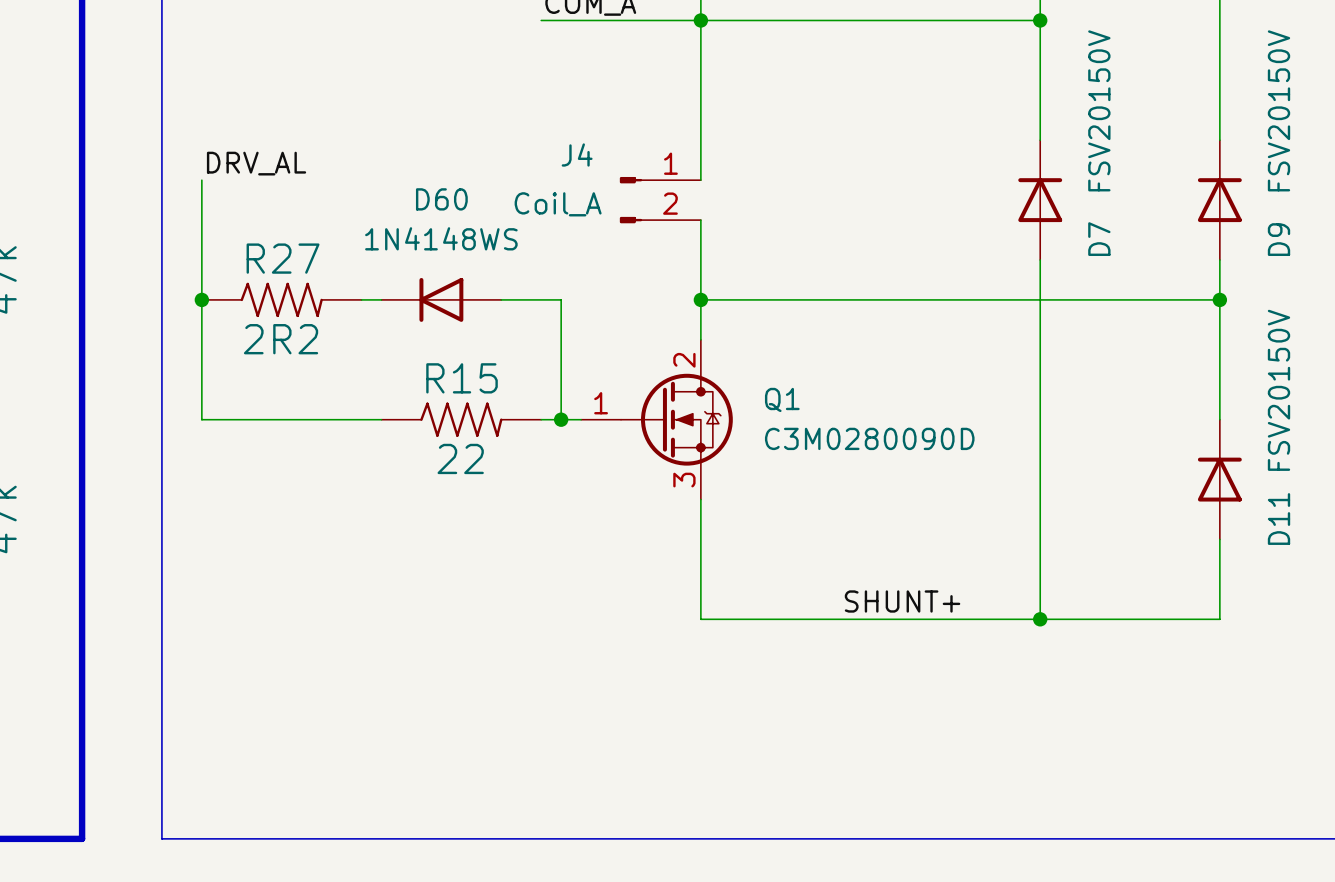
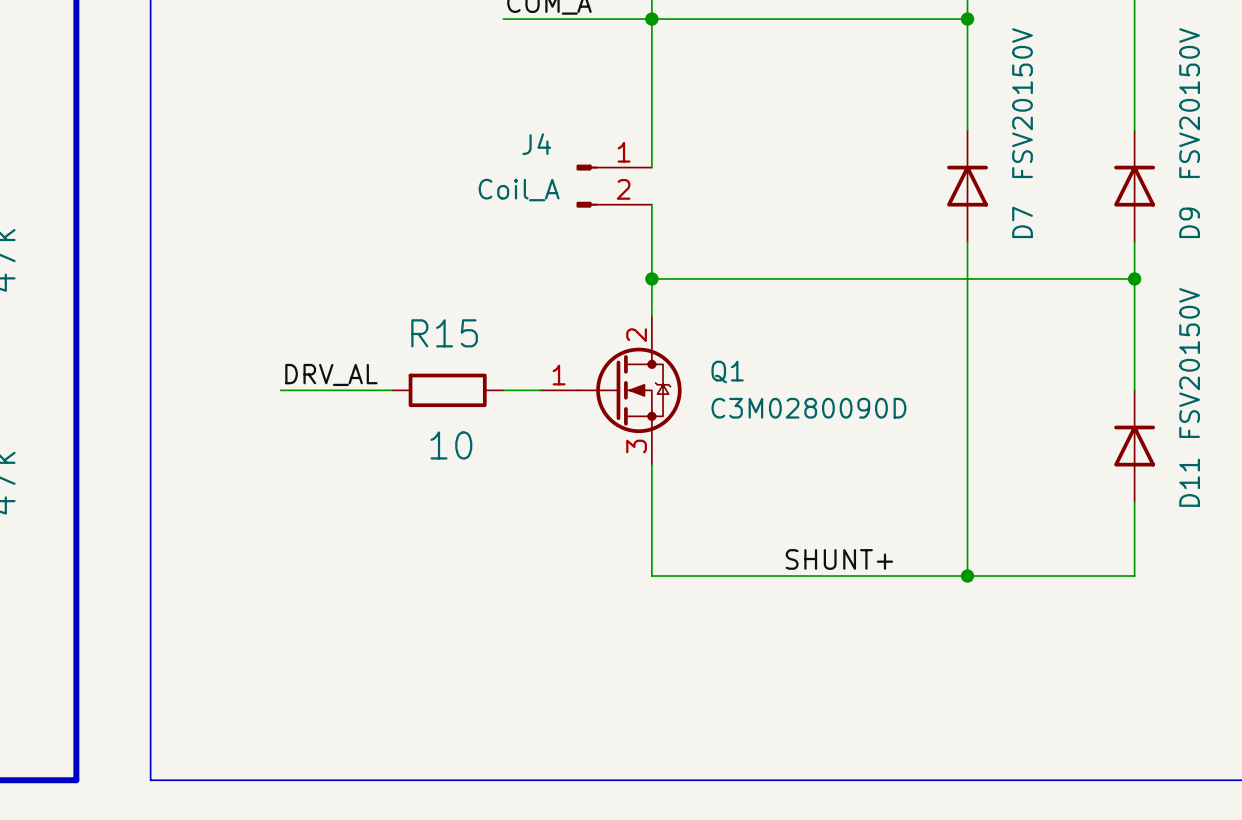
label position: DRV_AL (256, 163) -> DRV_AL (331, 374)
wire: (201, 180) (201, 419) (301, 419) -> none
junction: (201, 299) -> none
R27: 2R2 (281, 299) -> none
wire: (361, 299) (381, 299) -> none
D60: 1N4148WS (441, 299) -> none
wire: (501, 299) (561, 299) (561, 419) -> none
R15 symbol: [381, 402, 542, 437] -> [391, 373, 504, 408]
junction: (561, 419) -> none
R15 value: 22 (460, 458) -> 10 (451, 445)

